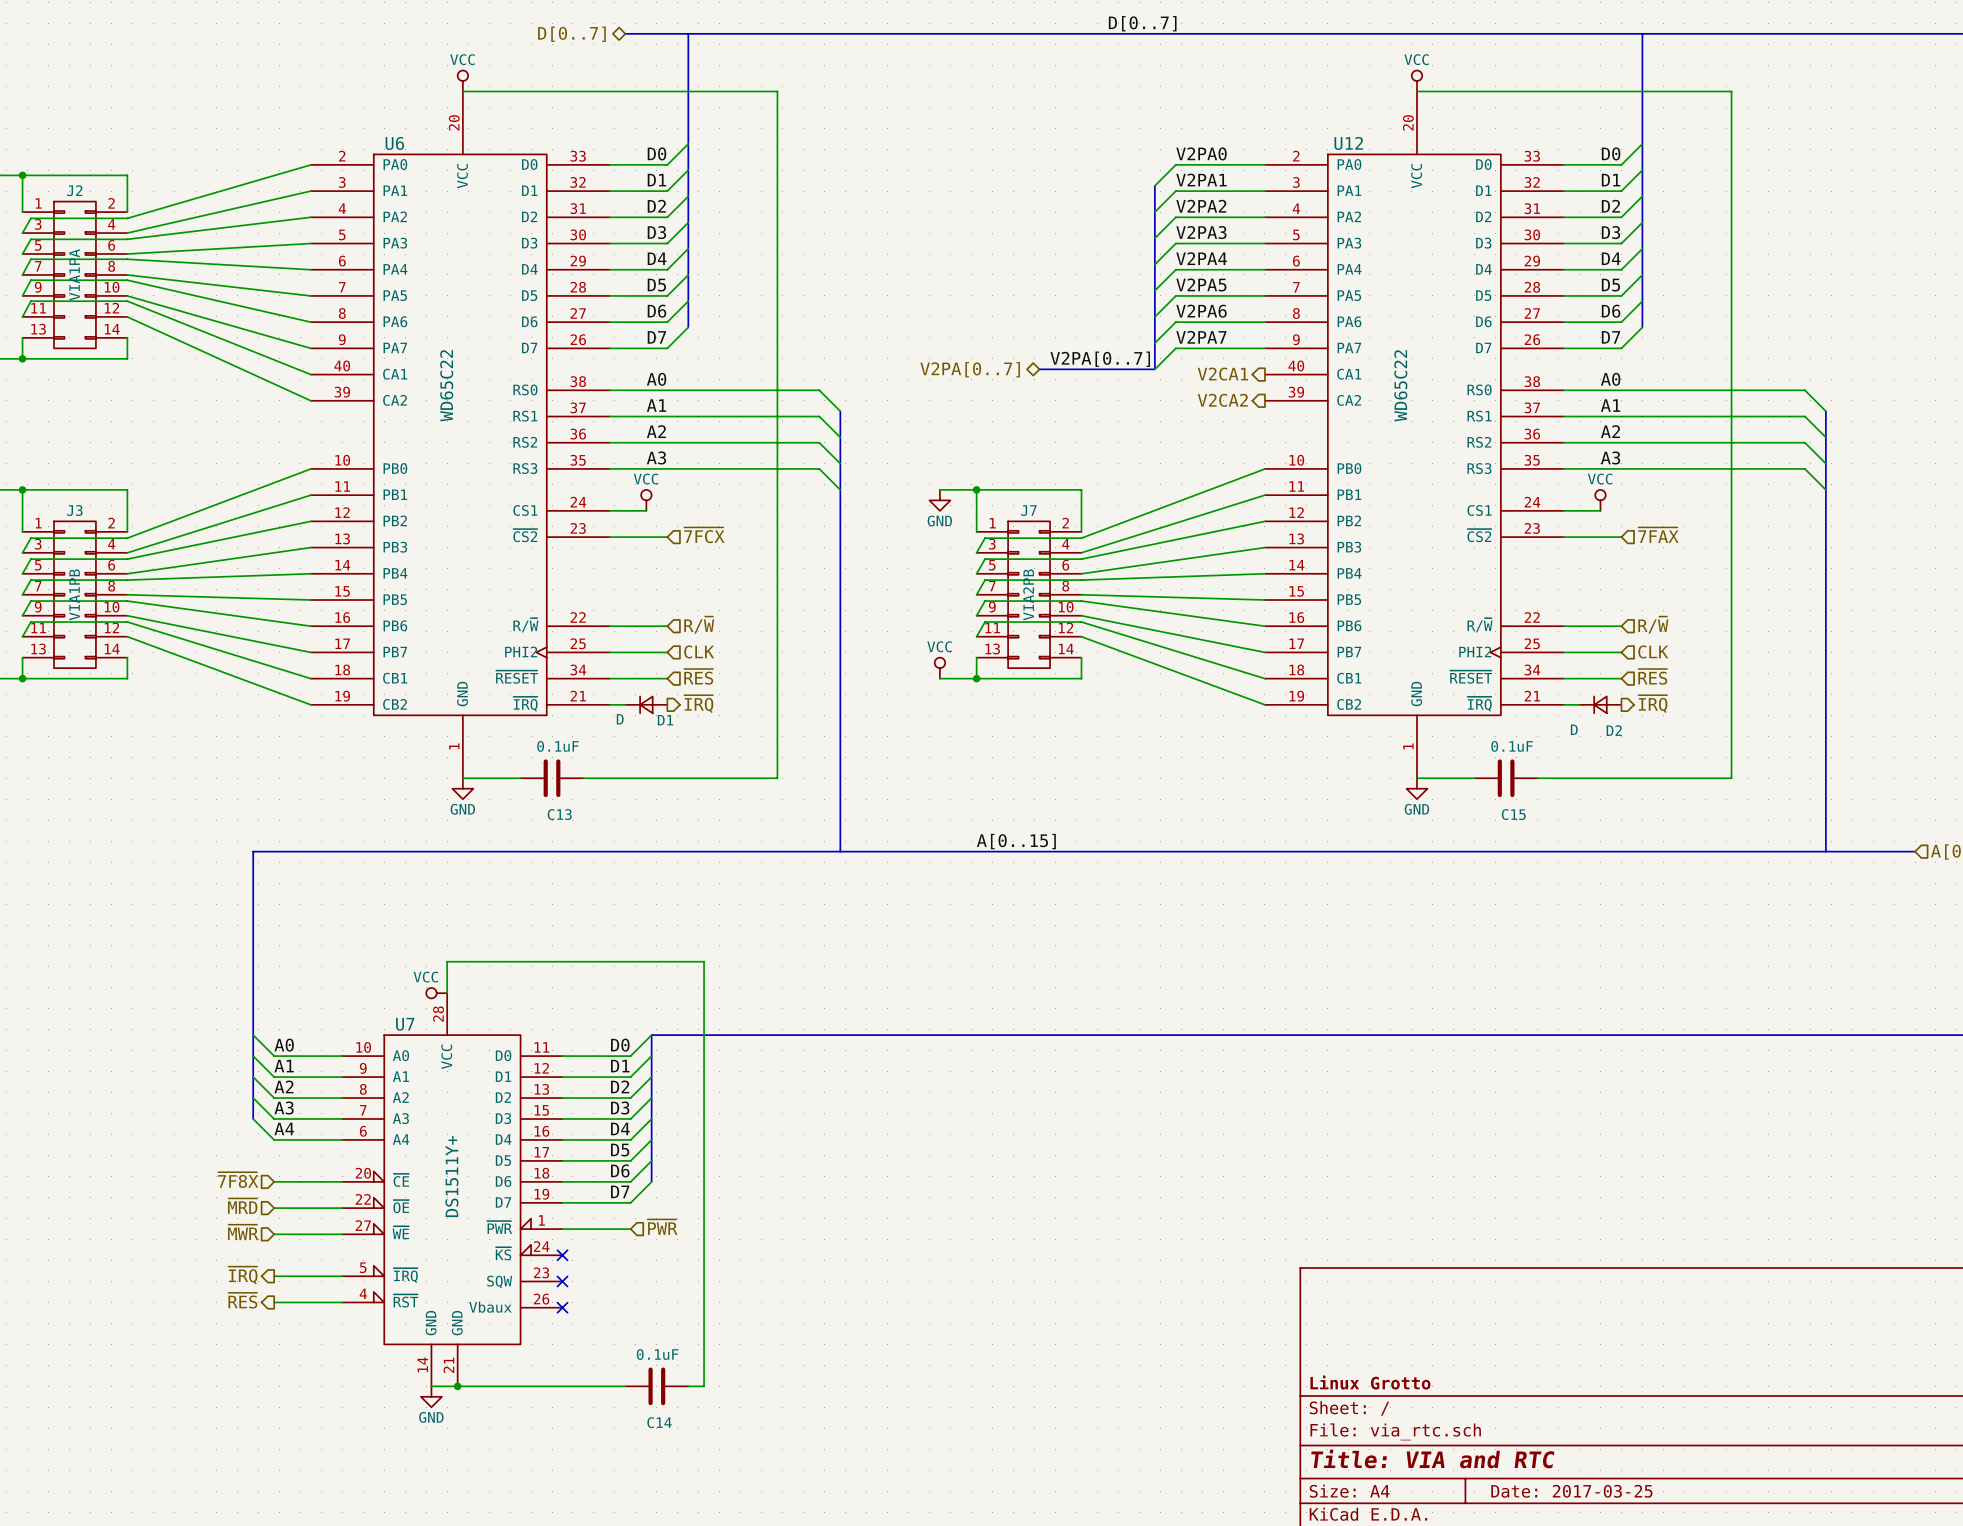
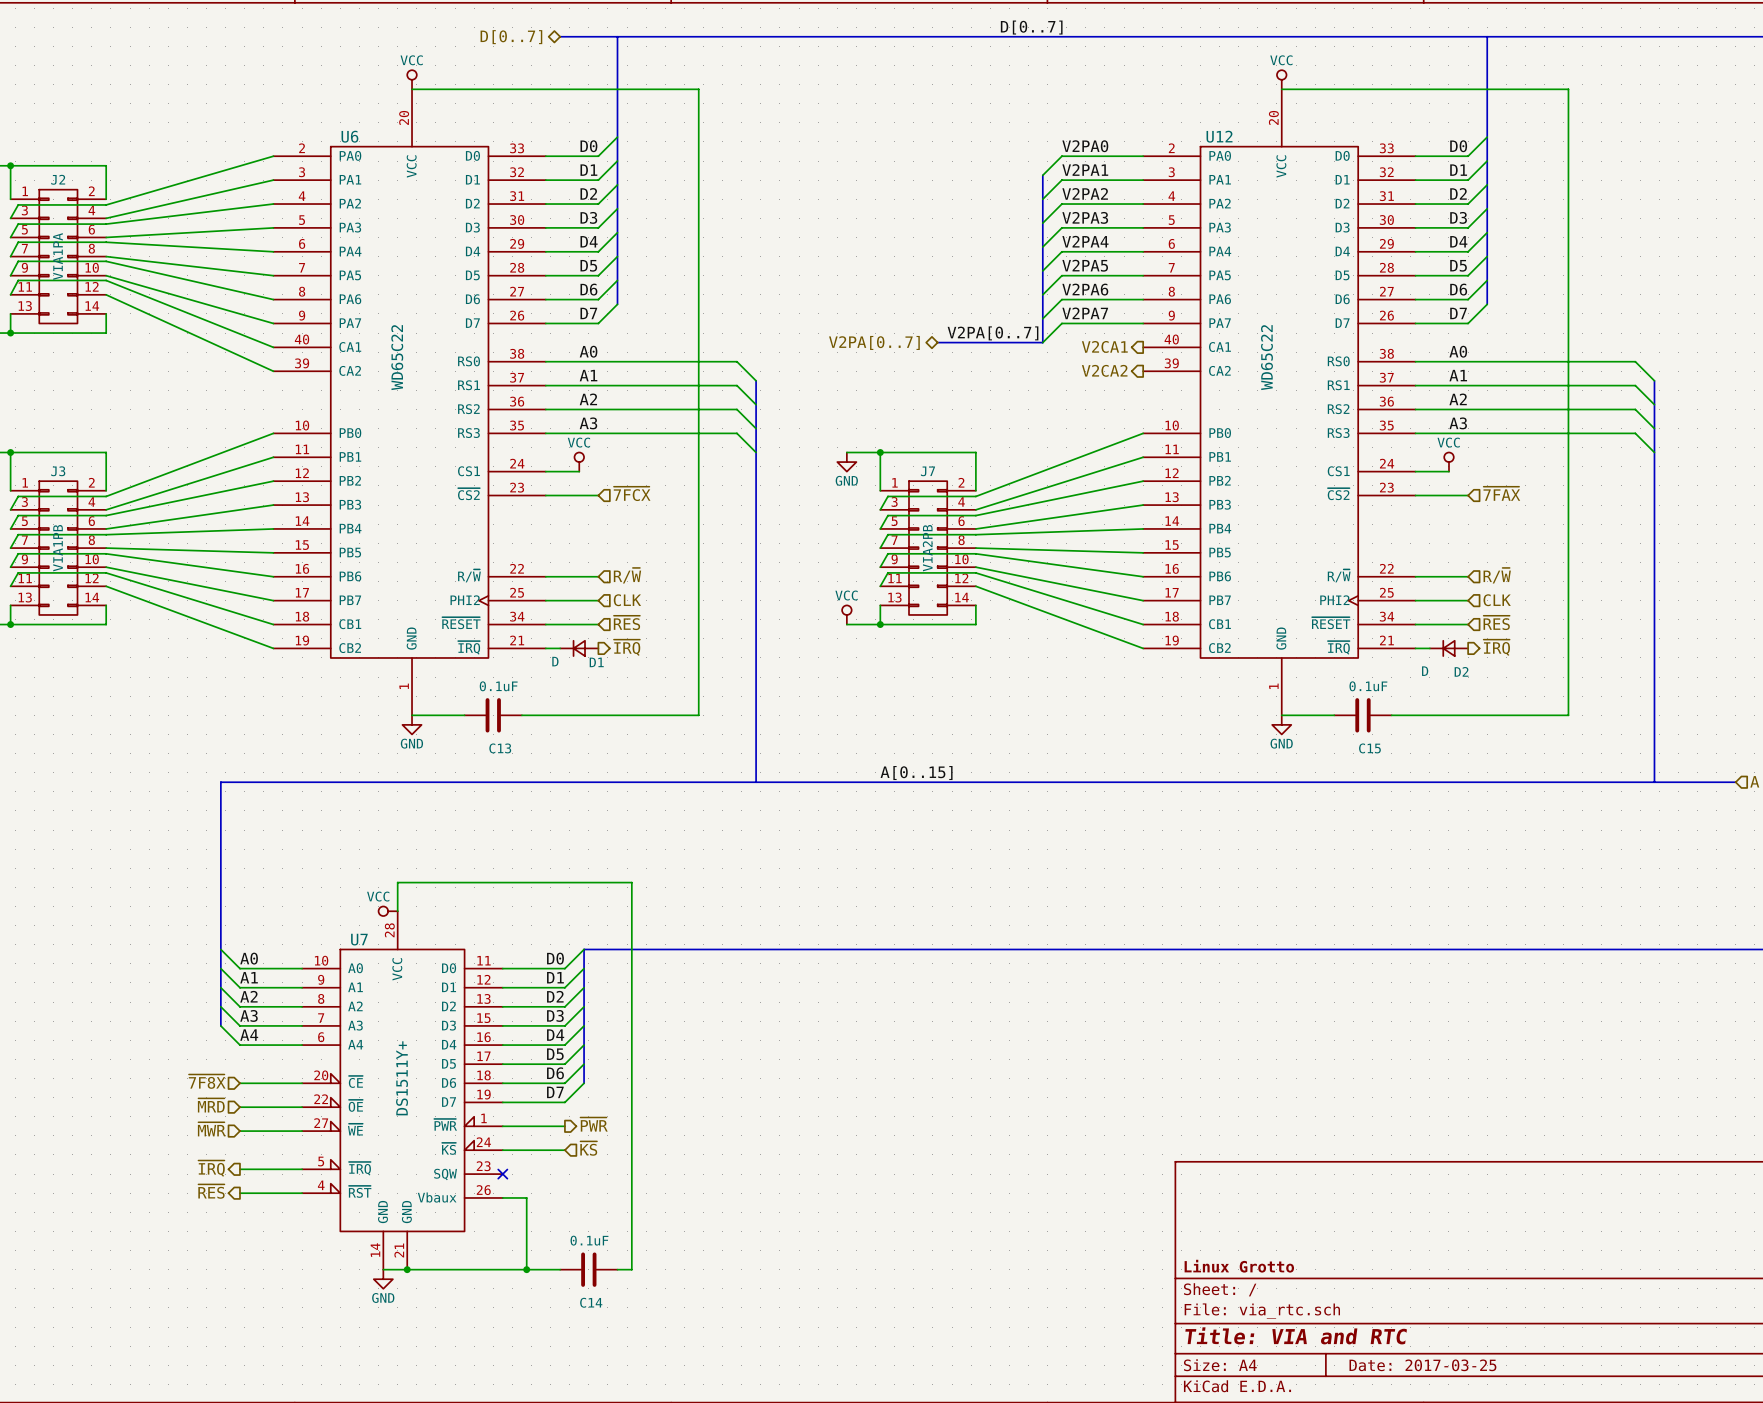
hierarchical label shape: input (662, 1227) -> output (594, 1124)
hierarchical label: none -> ~{KS} (588, 1148)
wire: none -> (502, 1150) (564, 1150)
no-connect mark: (562, 1255) -> none
wire: none -> (502, 1197) (526, 1197) (526, 1269)
no-connect mark: (562, 1307) -> none
junction: none -> (526, 1269)

